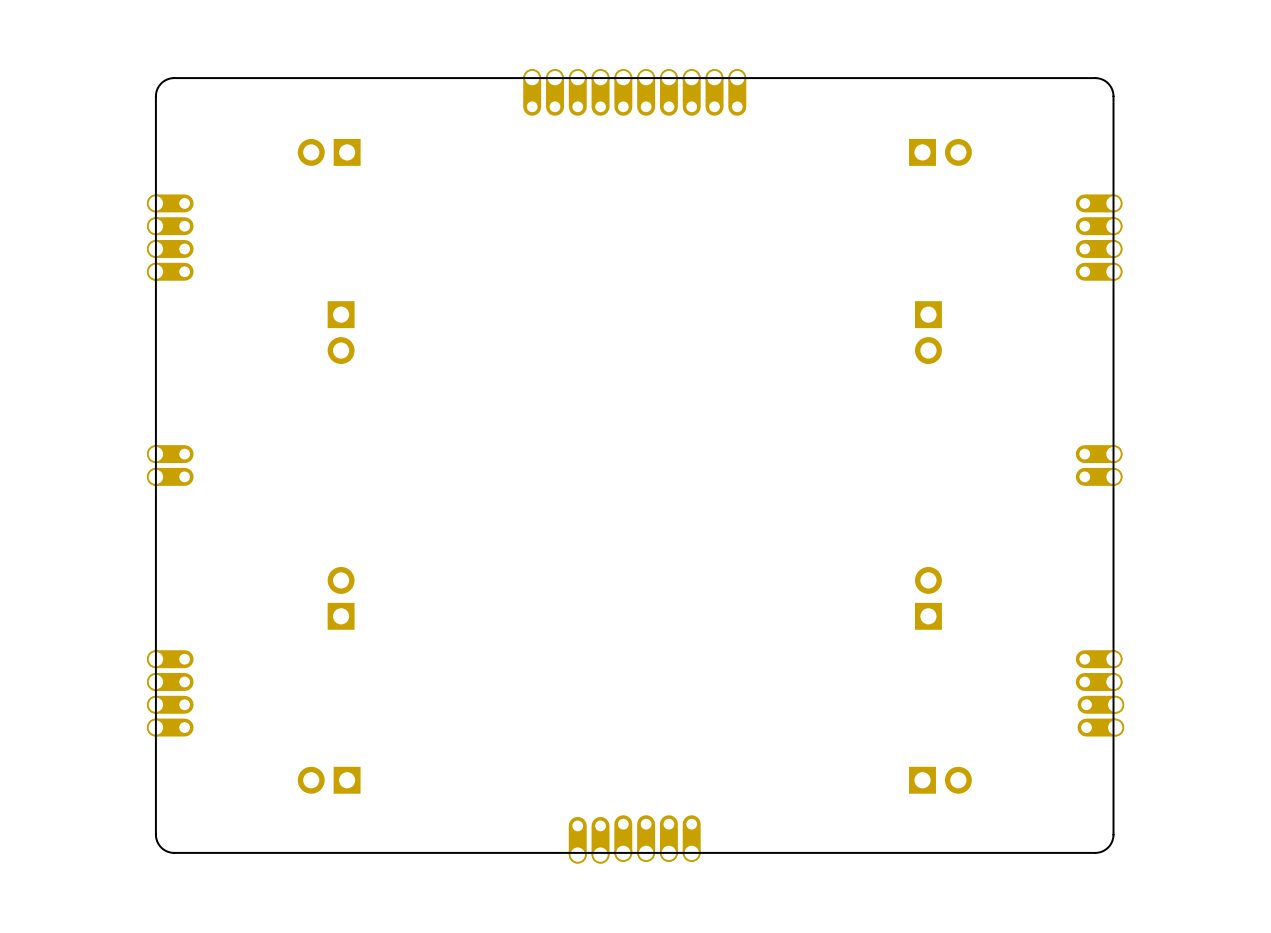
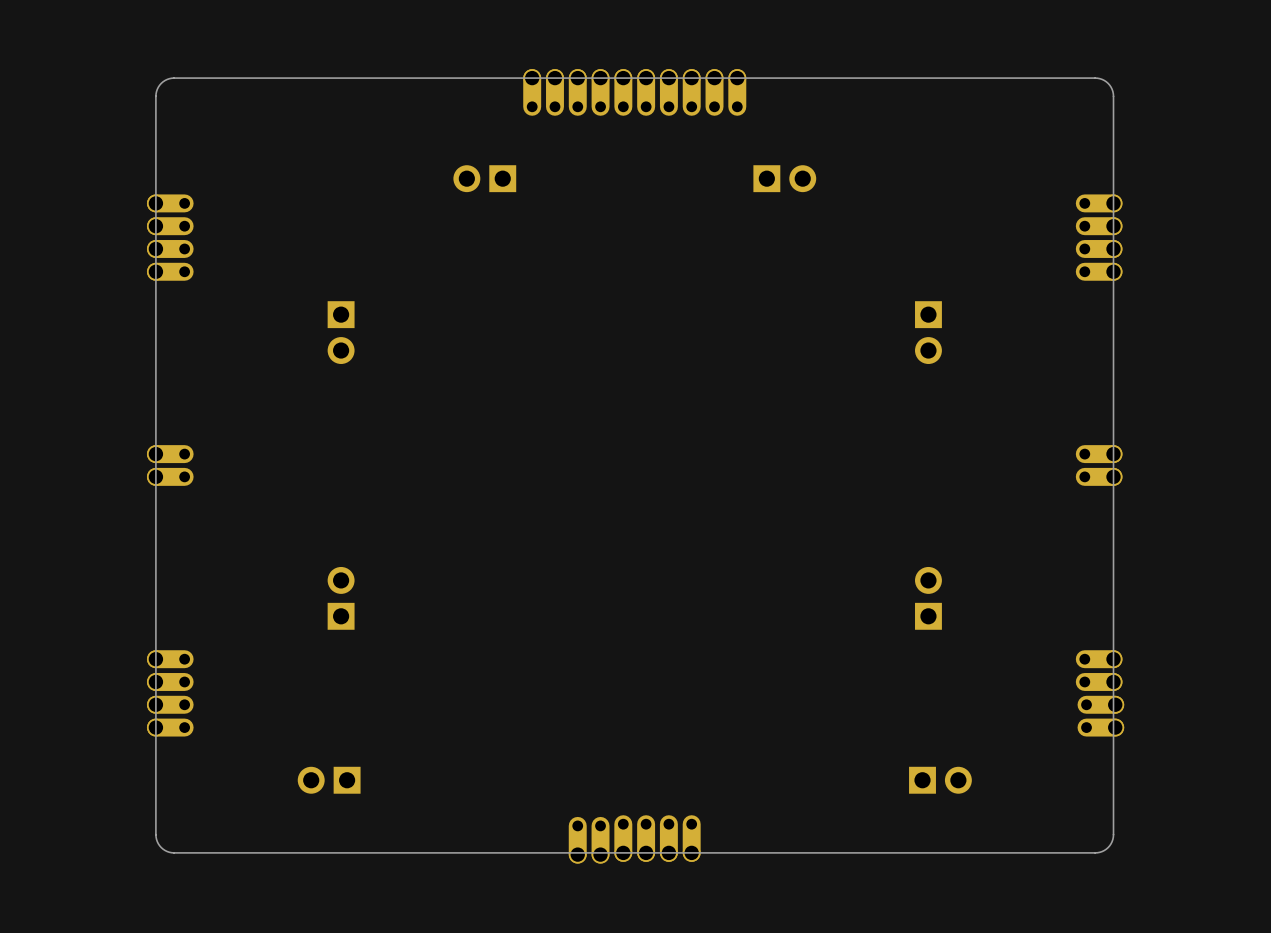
part position: (329, 152) -> (484, 178)
part position: (940, 152) -> (784, 178)

